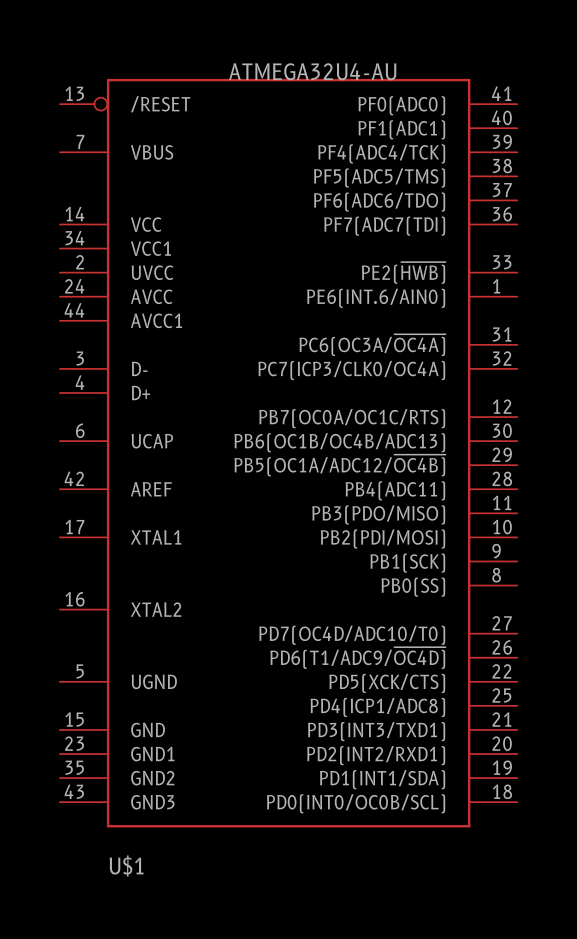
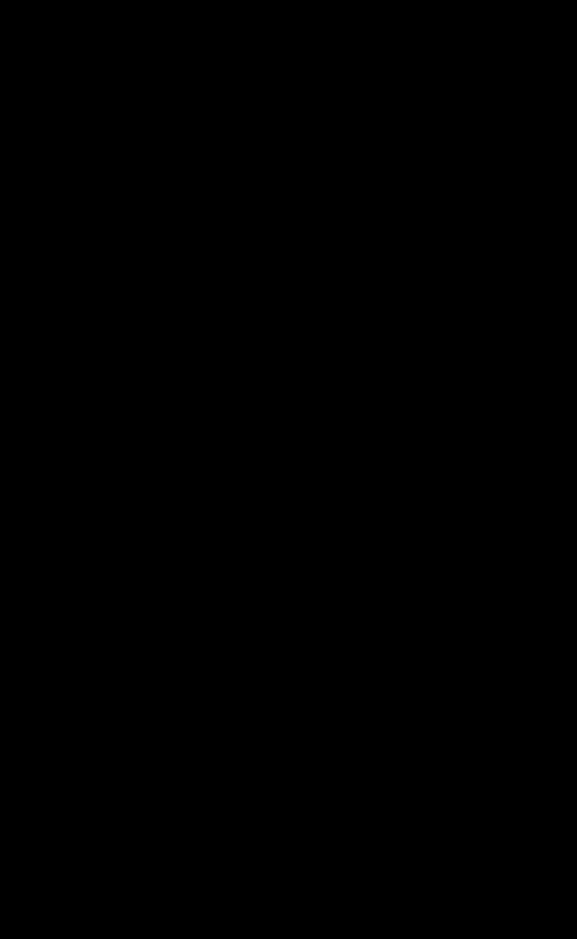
U$1: ATMEGA32U4-AU (288, 453) -> none

